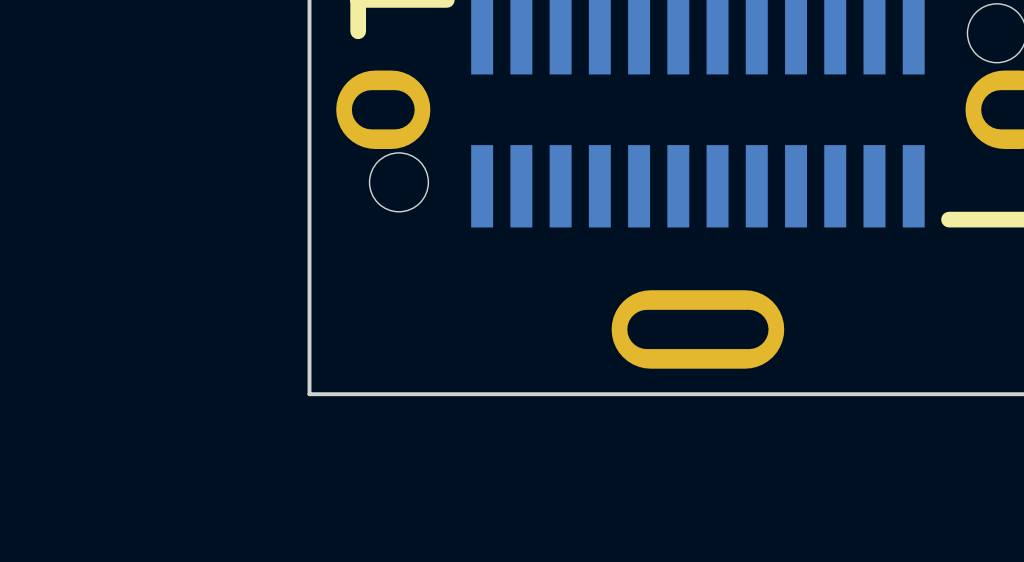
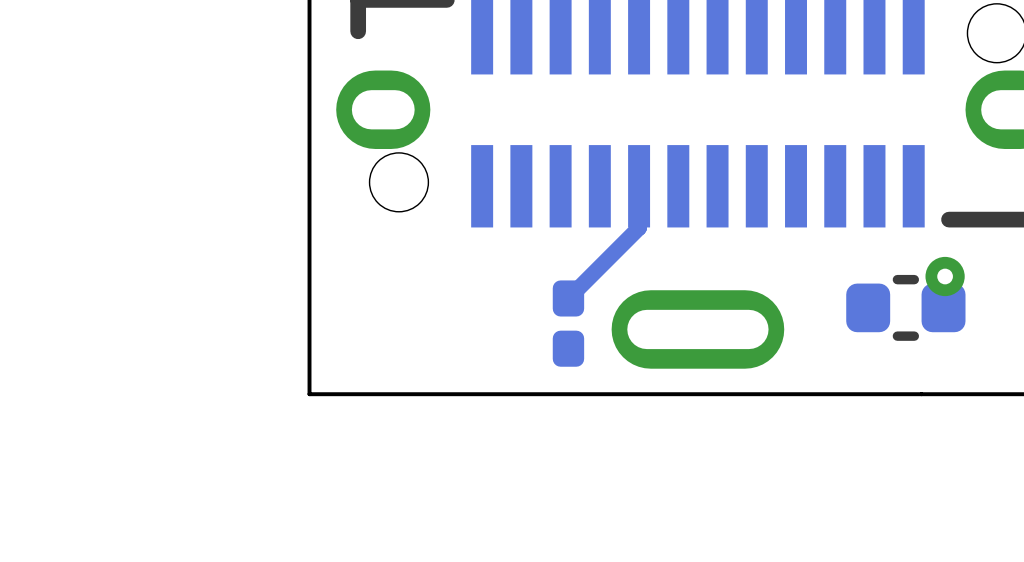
track: none -> (639, 186) (639, 227) (568, 298)
via: none -> (945, 276)
part: none -> (905, 307)
part: none -> (568, 323)

